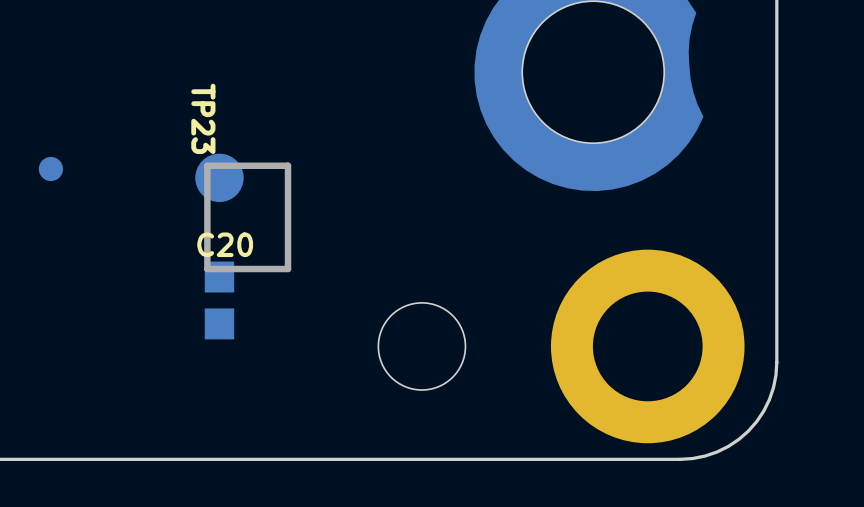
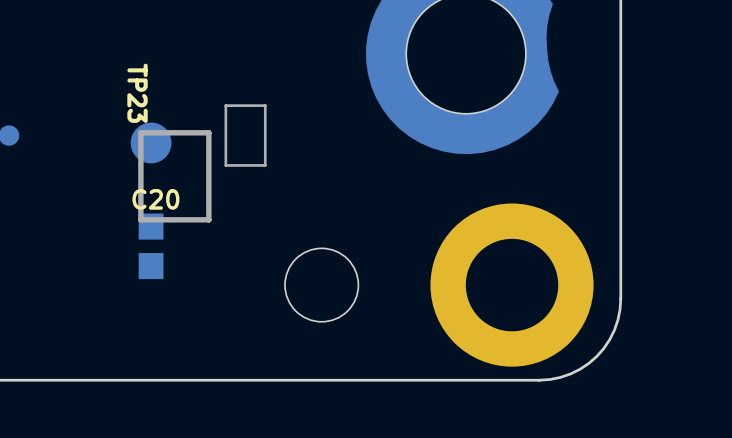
part: none -> (245, 135)

